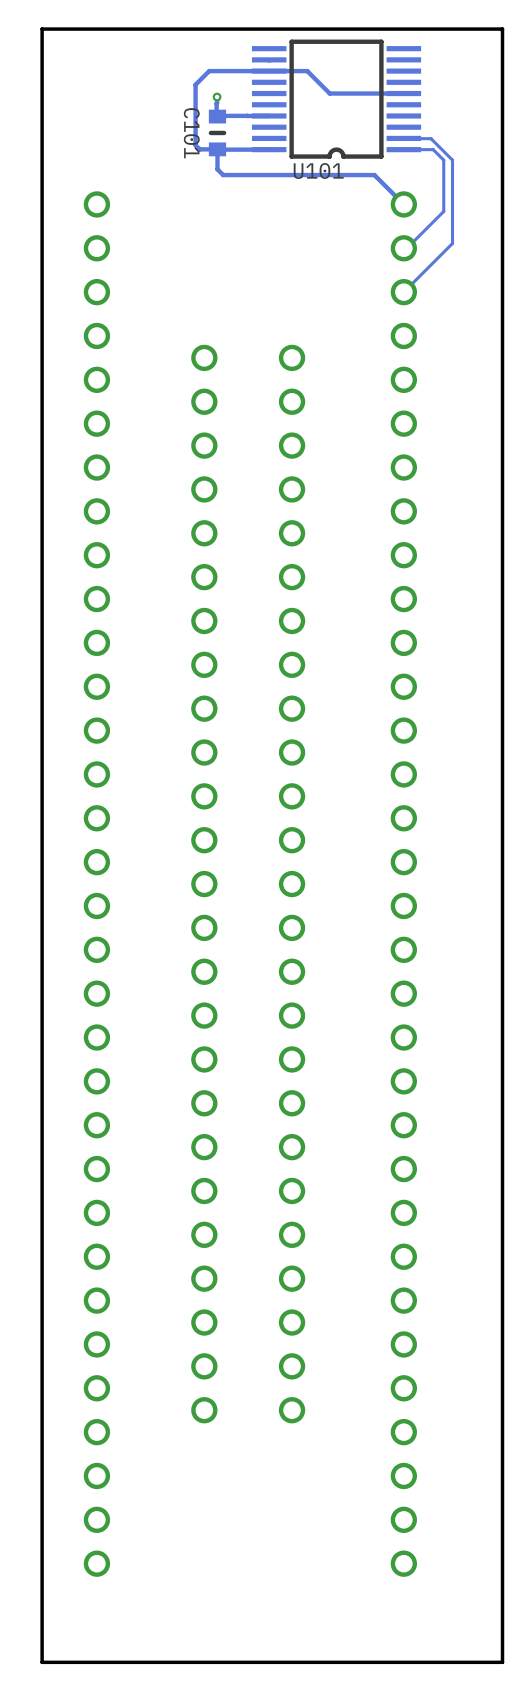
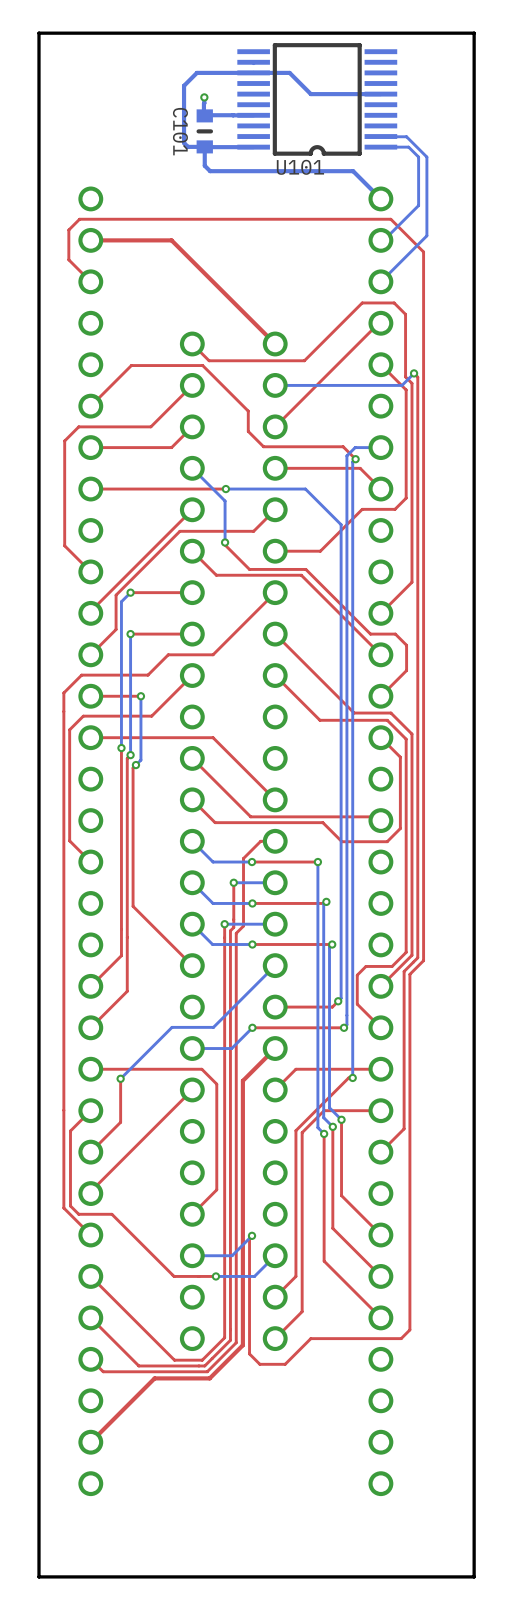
top track: none -> (90, 240) (171, 240) (275, 343)
top track: none -> (90, 281) (68, 259) (68, 230) (79, 219) (390, 219) (423, 251) (423, 960) (409, 974) (409, 1329) (401, 1338) (310, 1338) (285, 1364) (259, 1364) (249, 1353) (249, 1238) (252, 1235)
top track: none -> (380, 323) (275, 426)
top track: none -> (192, 343) (209, 360) (304, 360) (362, 302) (394, 302) (405, 314) (405, 376) (411, 383) (411, 582) (380, 613)
top track: none -> (380, 364) (406, 389) (406, 498) (394, 509) (362, 509) (320, 551) (275, 551)
bottom track: none -> (414, 373) (402, 385) (275, 385)
top track: none -> (414, 373) (417, 377) (417, 957) (404, 971) (404, 1128) (380, 1152)
via: none -> (414, 373)
top track: none -> (192, 385) (150, 426) (78, 426) (64, 440) (64, 545) (90, 571)
top track: none -> (90, 406) (131, 365) (202, 365) (248, 411) (248, 431) (263, 446) (343, 446) (355, 459)
top track: none -> (192, 426) (171, 447) (90, 447)
bottom track: none -> (380, 447) (355, 447) (346, 455) (346, 1024) (344, 1027)
bottom track: none -> (355, 459) (352, 462) (352, 1077)
via: none -> (355, 459)
bottom track: none -> (192, 468) (225, 501) (225, 542)
top track: none -> (275, 468) (360, 468) (380, 489)
bottom track: none -> (225, 489) (305, 489) (341, 524) (341, 998) (338, 1001)
top track: none -> (225, 489) (90, 489)
via: none -> (225, 489)
top track: none -> (192, 509) (90, 613)
top track: none -> (275, 509) (253, 531) (179, 531) (116, 595) (116, 629) (90, 654)
top track: none -> (225, 542) (225, 544) (249, 569) (305, 569) (370, 634) (395, 634) (406, 645) (406, 670) (380, 696)
via: none -> (225, 542)
top track: none -> (192, 551) (216, 575) (301, 575) (380, 654)
bottom track: none -> (130, 592) (121, 601) (121, 748)
via: none -> (130, 592)
top track: none -> (192, 592) (130, 592)
top track: none -> (275, 592) (213, 654) (168, 654) (147, 675) (81, 675) (63, 692) (63, 1208) (90, 1235)
bottom track: none -> (130, 634) (130, 755)
via: none -> (130, 634)
top track: none -> (192, 634) (130, 634)
top track: none -> (275, 634) (354, 713) (390, 713) (411, 734) (411, 955) (380, 986)
top track: none -> (192, 675) (151, 716) (83, 716) (69, 729) (69, 840) (90, 862)
top track: none -> (275, 675) (319, 720) (387, 720) (406, 739) (406, 952) (392, 966) (365, 966) (357, 975) (357, 1004) (380, 1027)
bottom track: none -> (140, 696) (140, 760) (135, 765)
top track: none -> (140, 696) (90, 696)
via: none -> (140, 696)
top track: none -> (90, 737) (213, 737) (275, 799)
top track: none -> (380, 737) (400, 757) (400, 828) (387, 841) (341, 841) (322, 822) (215, 822) (192, 799)
top track: none -> (121, 748) (121, 955) (90, 986)
via: none -> (121, 748)
top track: none -> (130, 755) (127, 758) (127, 991) (90, 1027)
via: none -> (130, 755)
top track: none -> (192, 758) (250, 816) (377, 816) (380, 820)
top track: none -> (135, 765) (133, 767) (133, 906) (192, 965)
via: none -> (135, 765)
bottom track: none -> (192, 841) (213, 862) (252, 862)
top track: none -> (275, 841) (260, 841) (243, 858) (243, 926) (236, 933) (236, 1342) (207, 1371) (103, 1371) (90, 1359)
via: none -> (252, 862)
bottom track: none -> (317, 862) (317, 1127) (324, 1133)
top track: none -> (317, 862) (252, 862)
via: none -> (317, 862)
bottom track: none -> (192, 882) (213, 903) (252, 903)
top track: none -> (233, 882) (233, 927) (230, 930) (230, 1340) (204, 1365) (138, 1365) (90, 1317)
via: none -> (233, 882)
bottom track: none -> (275, 882) (233, 882)
bottom track: none -> (326, 901) (323, 903) (323, 1117) (332, 1126)
top track: none -> (326, 901) (323, 903) (252, 903)
via: none -> (326, 901)
via: none -> (252, 903)
bottom track: none -> (192, 924) (212, 944) (252, 944)
top track: none -> (224, 924) (224, 1337) (202, 1360) (174, 1360) (90, 1276)
via: none -> (224, 924)
bottom track: none -> (275, 924) (224, 924)
via: none -> (252, 944)
bottom track: none -> (332, 944) (329, 947) (329, 1107) (341, 1119)
top track: none -> (332, 944) (252, 944)
via: none -> (332, 944)
bottom track: none -> (275, 965) (213, 1027) (172, 1027) (120, 1078)
top track: none -> (338, 1001) (332, 1007) (275, 1007)
via: none -> (338, 1001)
bottom track: none -> (252, 1027) (231, 1048) (192, 1048)
via: none -> (252, 1027)
top track: none -> (344, 1027) (252, 1027)
via: none -> (344, 1027)
top track: none -> (275, 1048) (242, 1080) (242, 1345) (209, 1378) (154, 1378) (90, 1442)
top track: none -> (90, 1069) (201, 1069) (216, 1084) (216, 1189) (192, 1214)
top track: none -> (380, 1069) (295, 1069) (275, 1089)
top track: none -> (352, 1077) (348, 1077) (295, 1130) (295, 1276) (275, 1297)
via: none -> (352, 1077)
top track: none -> (120, 1078) (120, 1122) (90, 1152)
via: none -> (120, 1078)
top track: none -> (192, 1089) (90, 1193)
top track: none -> (90, 1110) (70, 1130) (70, 1206) (78, 1214) (111, 1214) (174, 1276) (215, 1276)
top track: none -> (380, 1110) (324, 1110) (302, 1132) (302, 1311) (275, 1338)
top track: none -> (341, 1119) (341, 1195) (380, 1235)
via: none -> (341, 1119)
top track: none -> (332, 1126) (332, 1228) (380, 1276)
via: none -> (332, 1126)
top track: none -> (324, 1133) (324, 1261) (380, 1317)
via: none -> (324, 1133)
bottom track: none -> (252, 1235) (232, 1255) (192, 1255)
via: none -> (252, 1235)
bottom track: none -> (275, 1255) (254, 1276) (215, 1276)
via: none -> (215, 1276)

